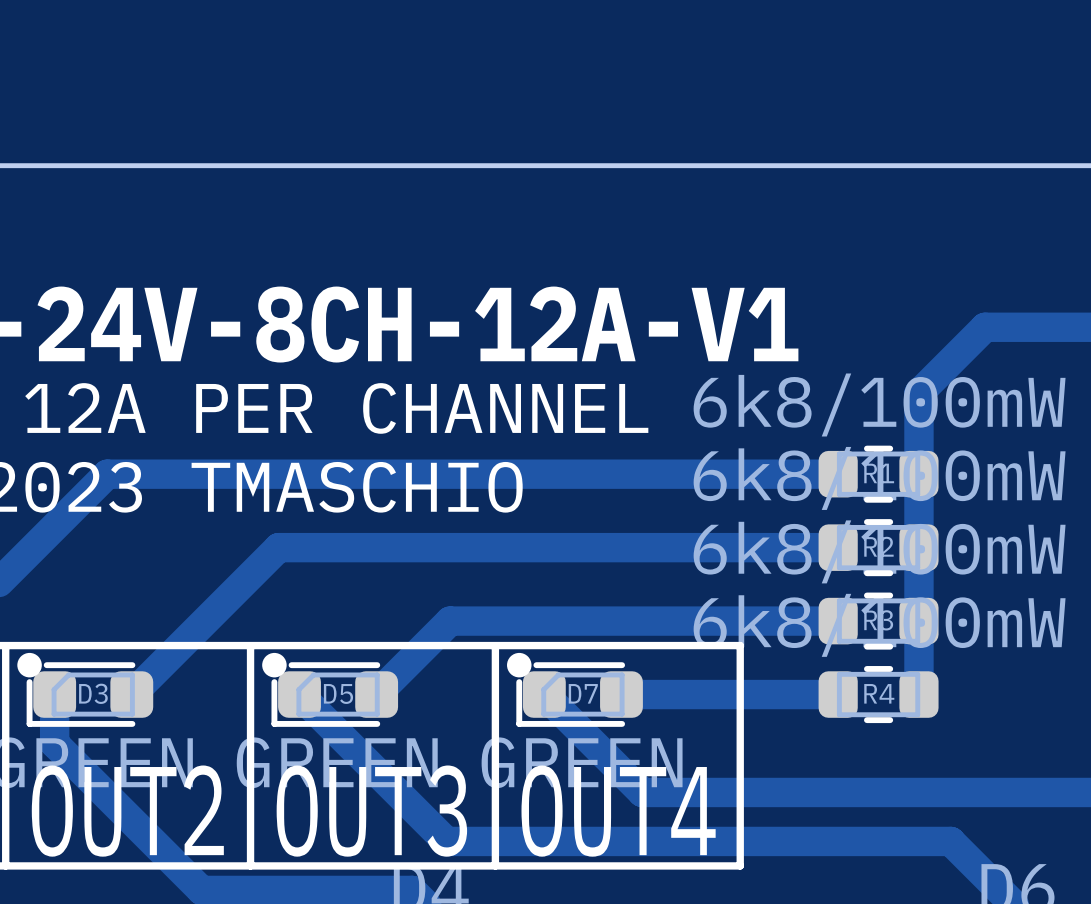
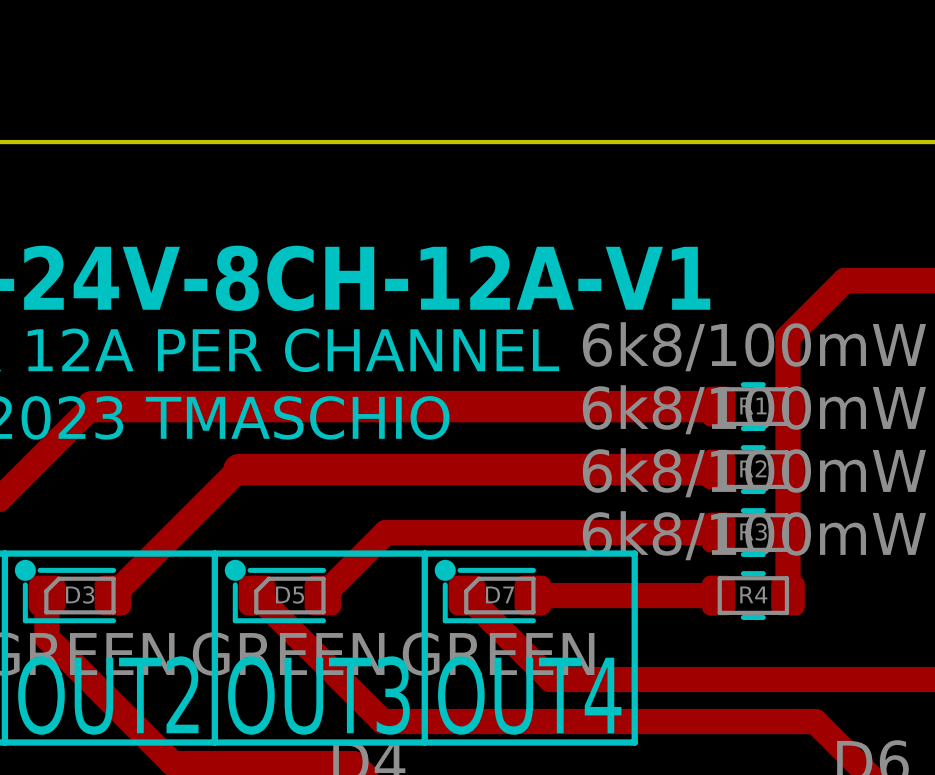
track width: thin (107, 474) (834, 474) -> thick (92, 406) (715, 406)
track width: thin (278, 547) (834, 547) -> thick (238, 469) (715, 469)

